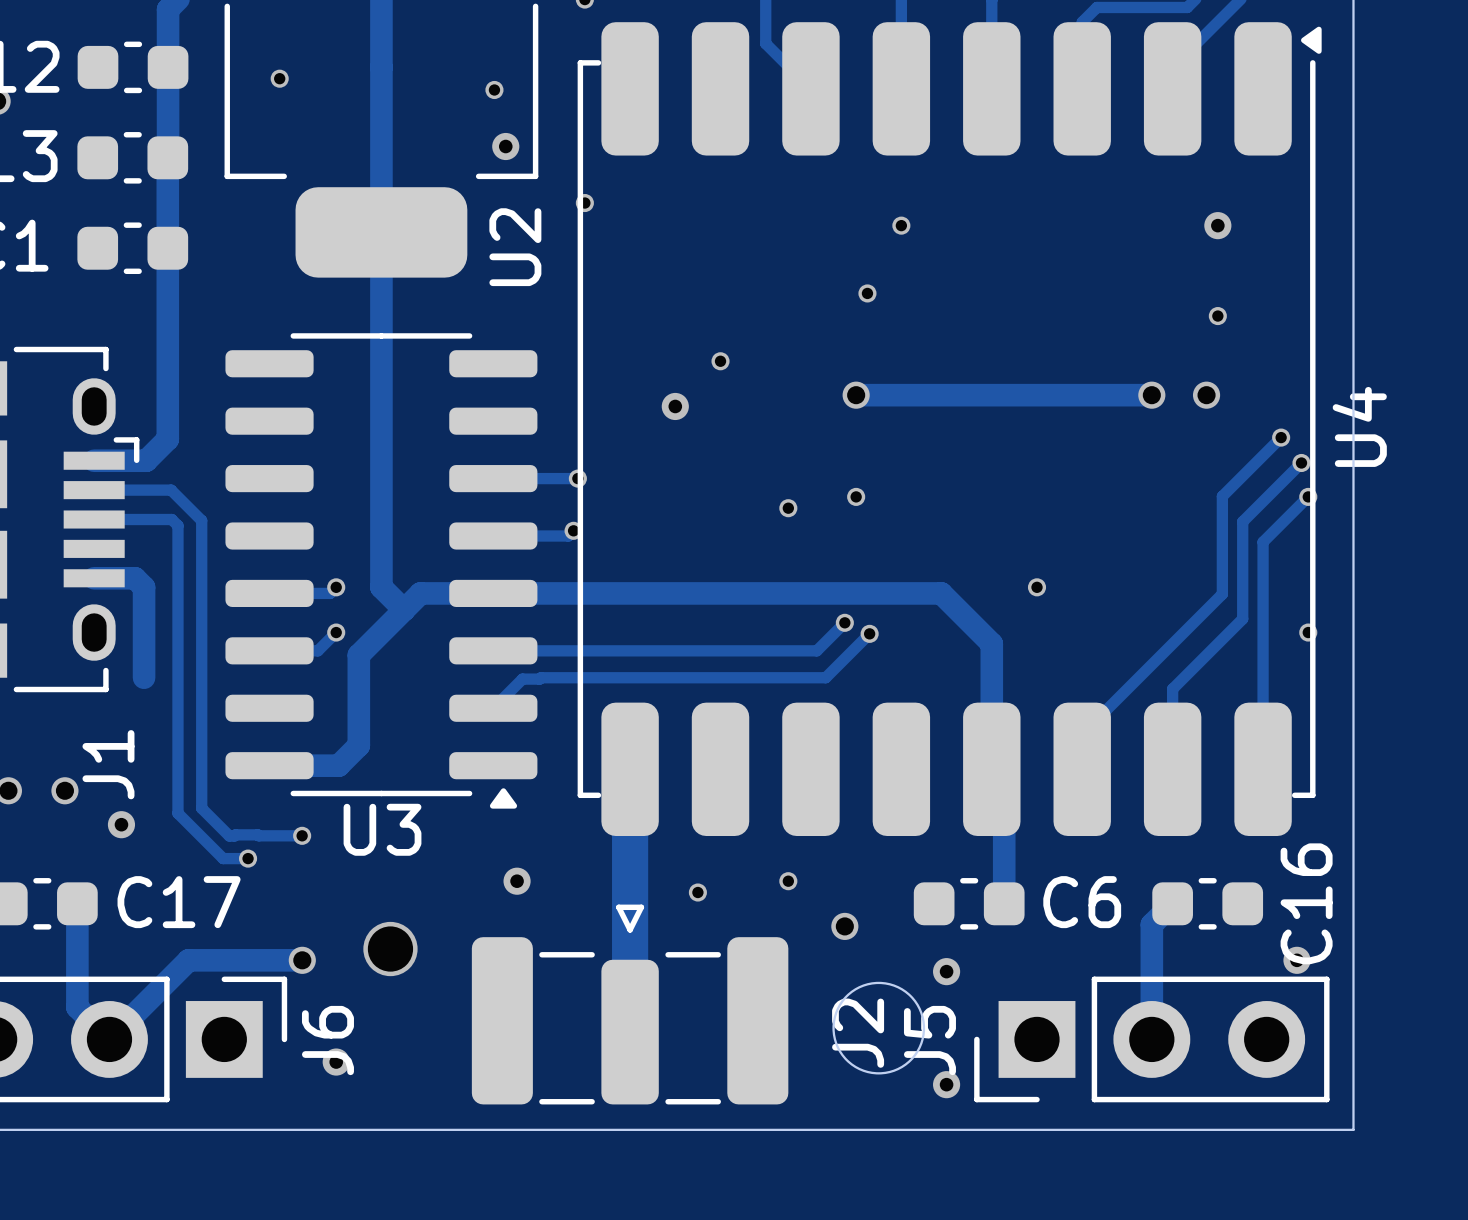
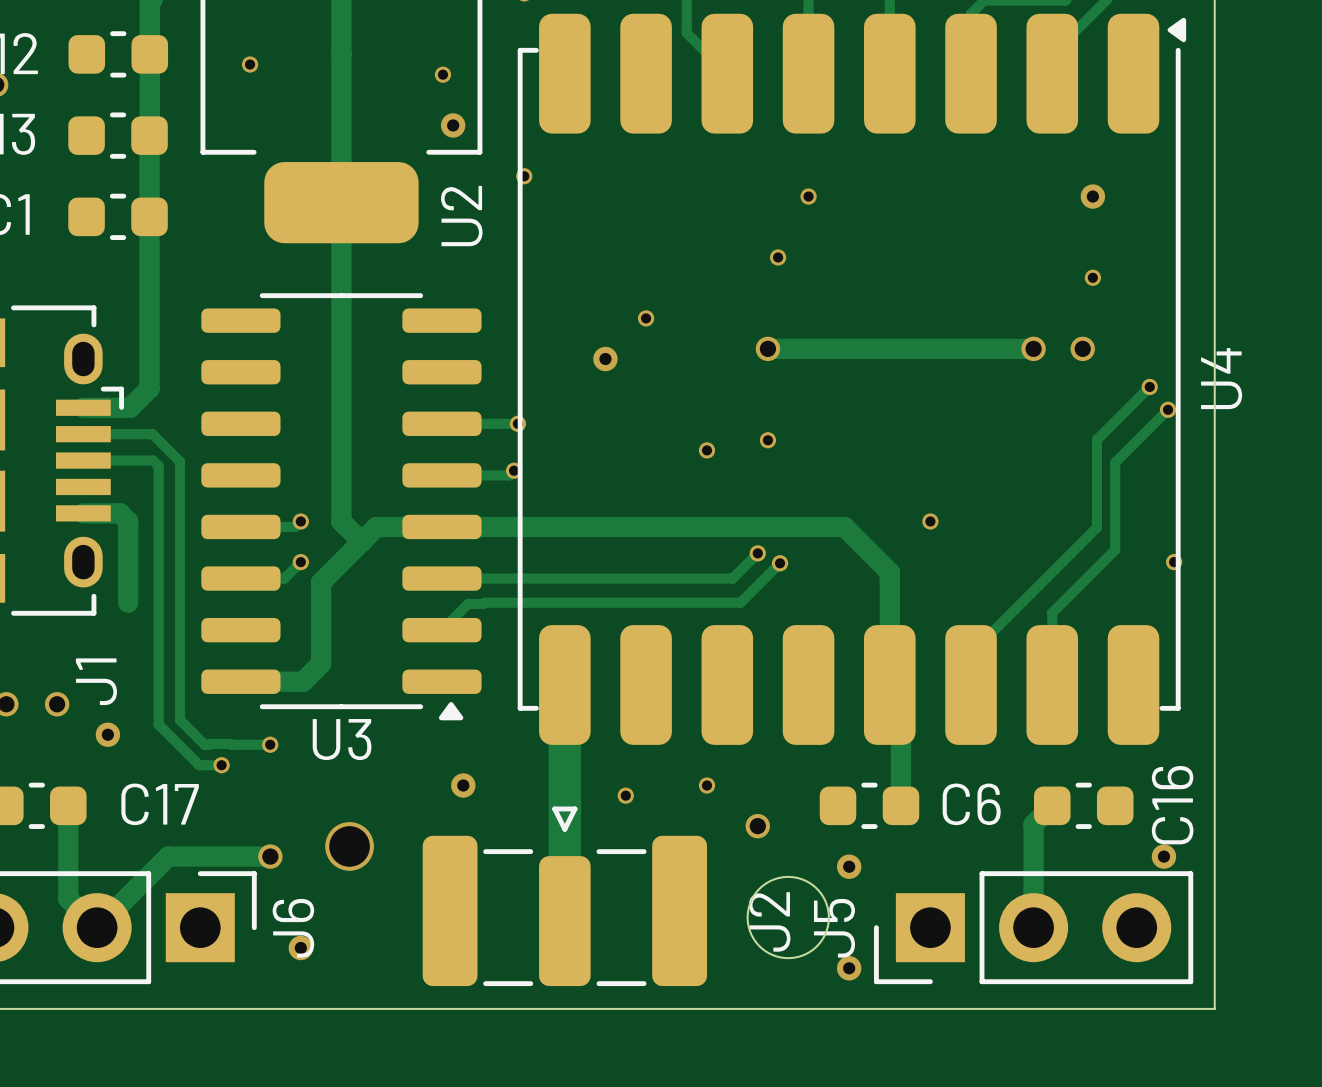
track: (1308, 496) (1263, 542) (1263, 769) -> none
via: (1308, 496) -> none

